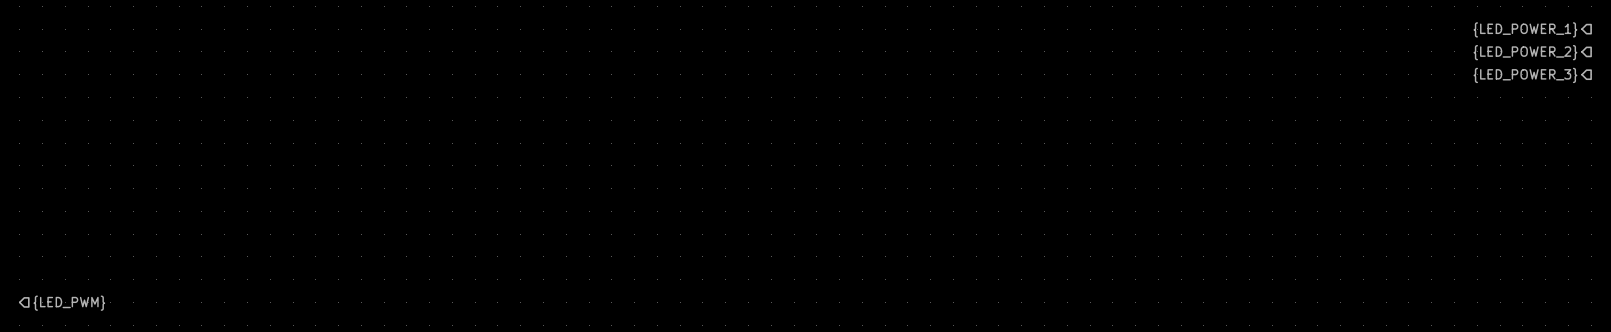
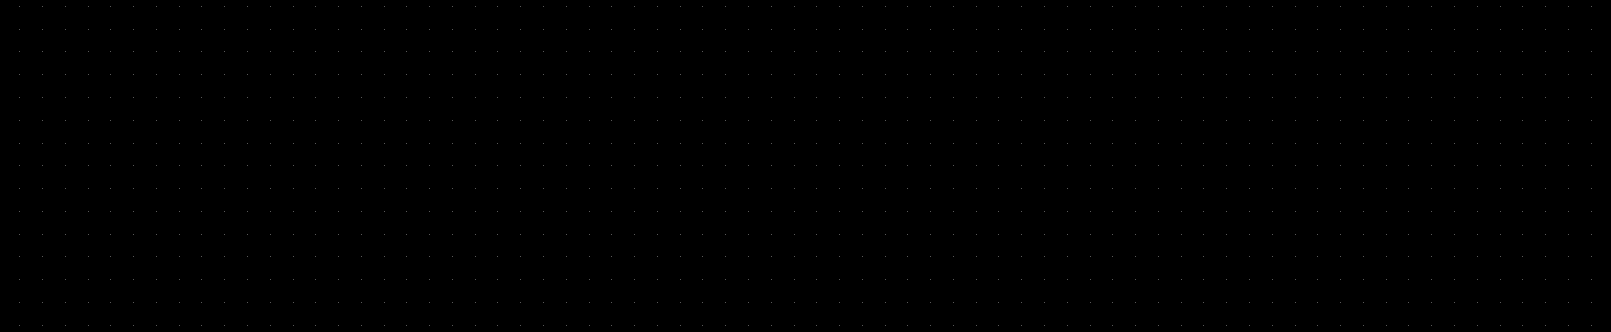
hierarchical label: {LED_POWER_1} (1525, 29) -> none
hierarchical label: {LED_POWER_2} (1525, 52) -> none
hierarchical label: {LED_POWER_3} (1525, 75) -> none
hierarchical label: {LED_PWM} (69, 303) -> none

